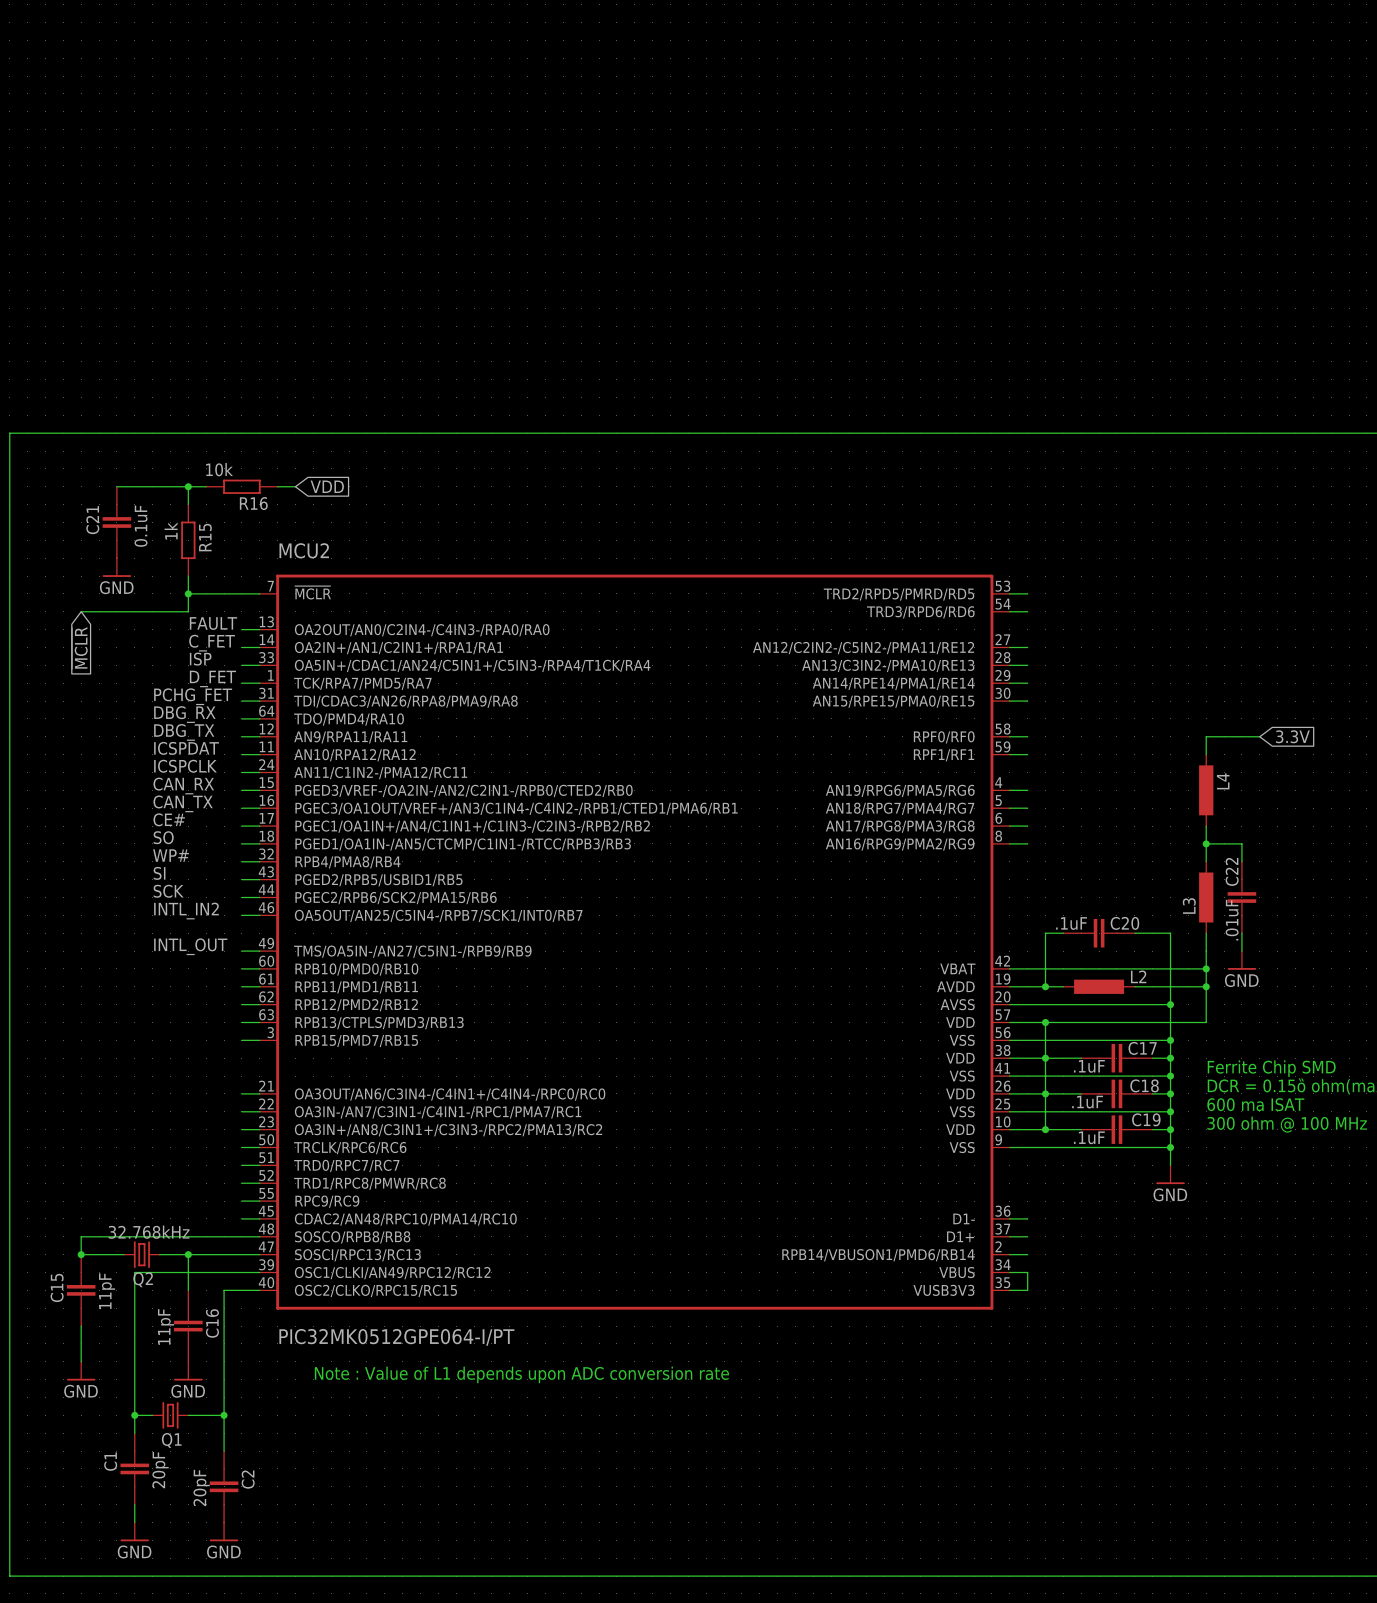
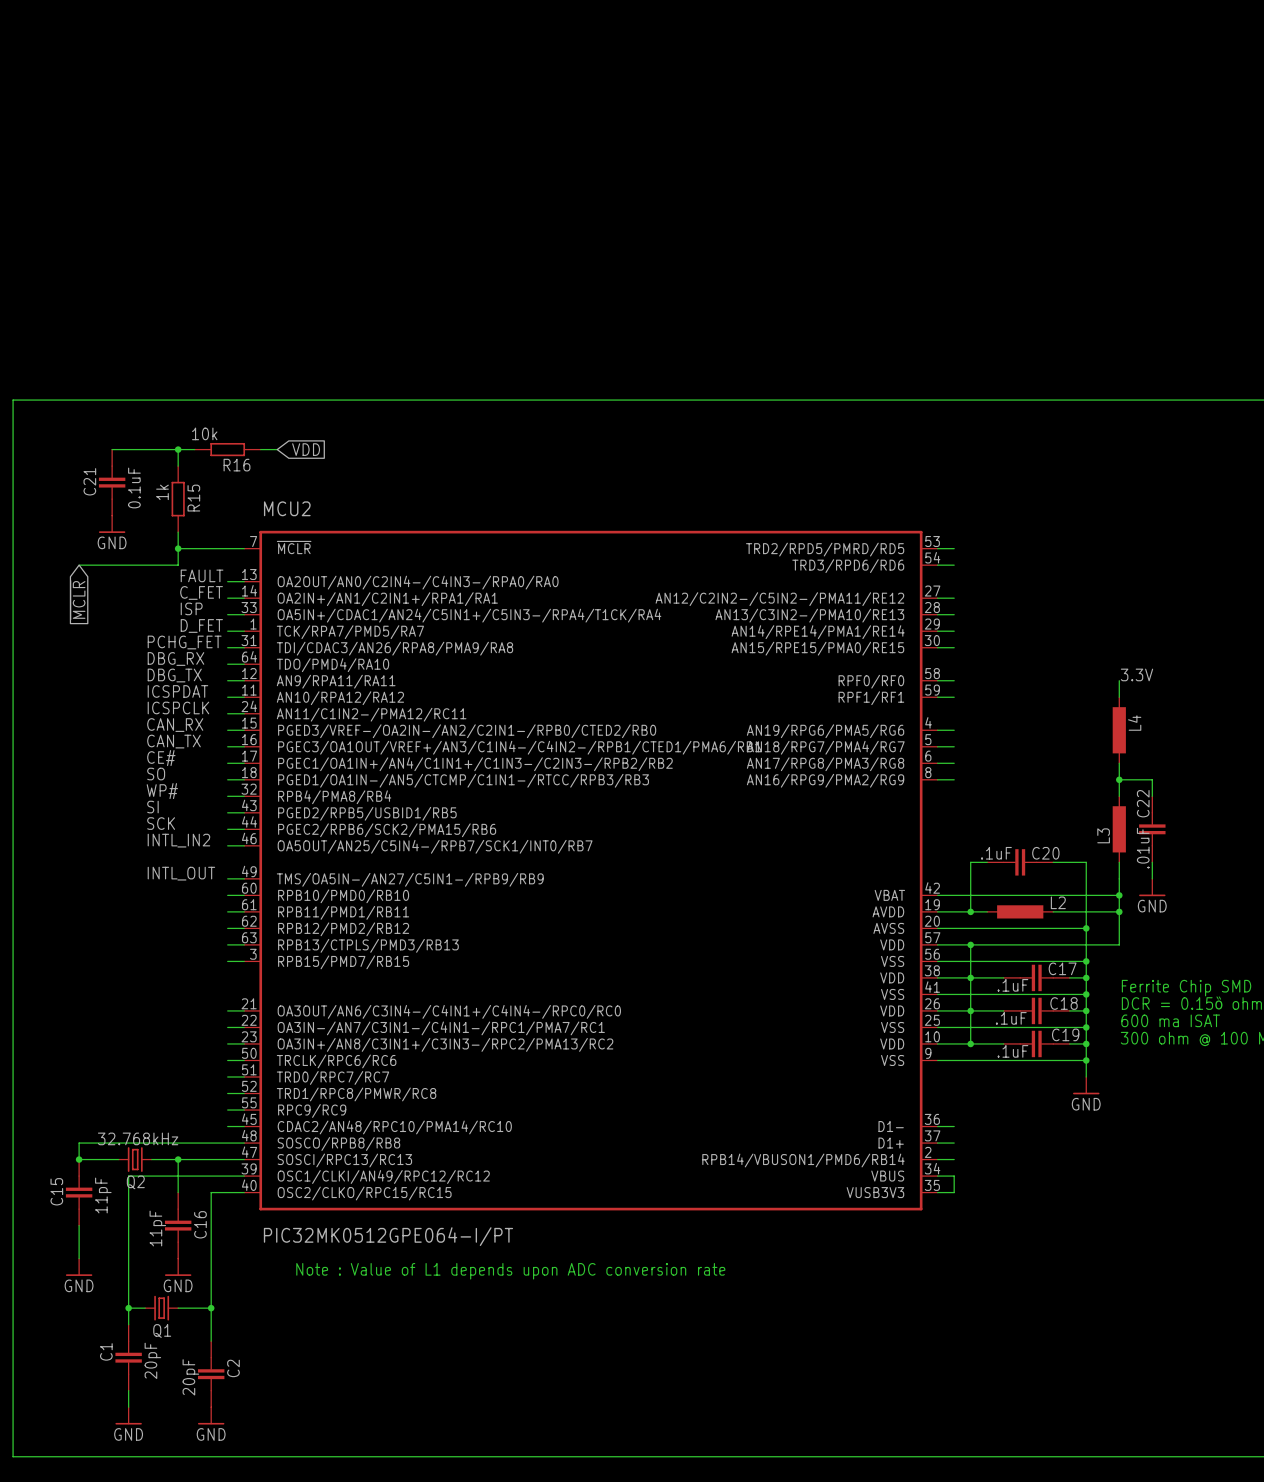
label: none -> 3.3V (1136, 674)
wire: (1206, 736) (1259, 736) -> none
global label: 3.3V (1292, 736) -> none

